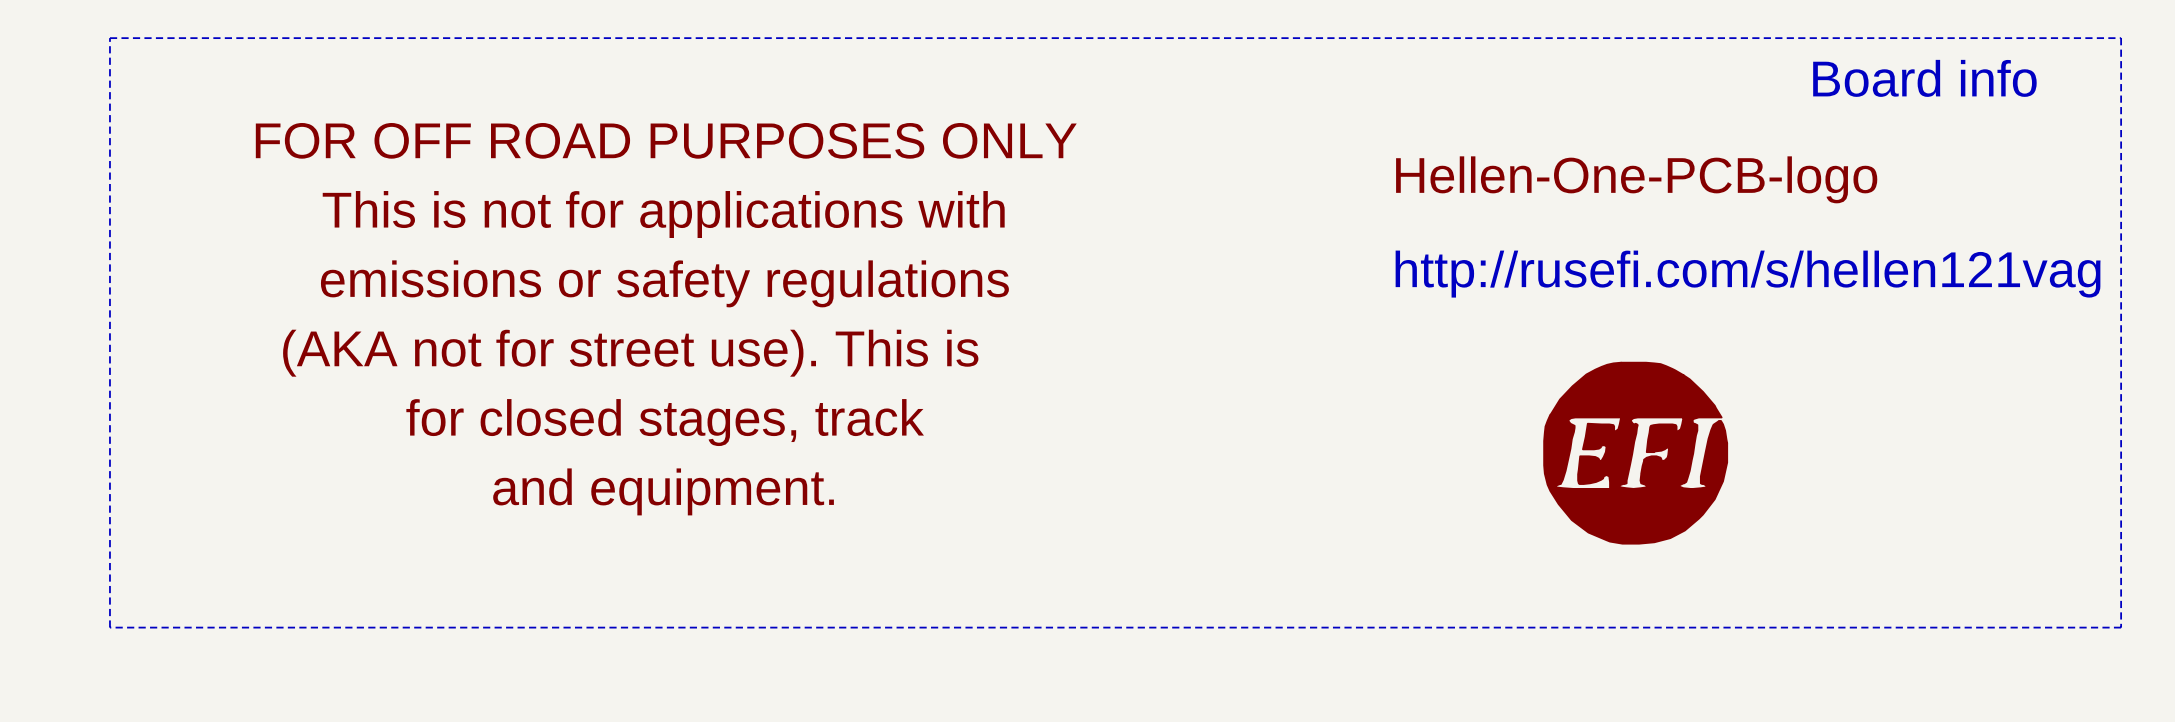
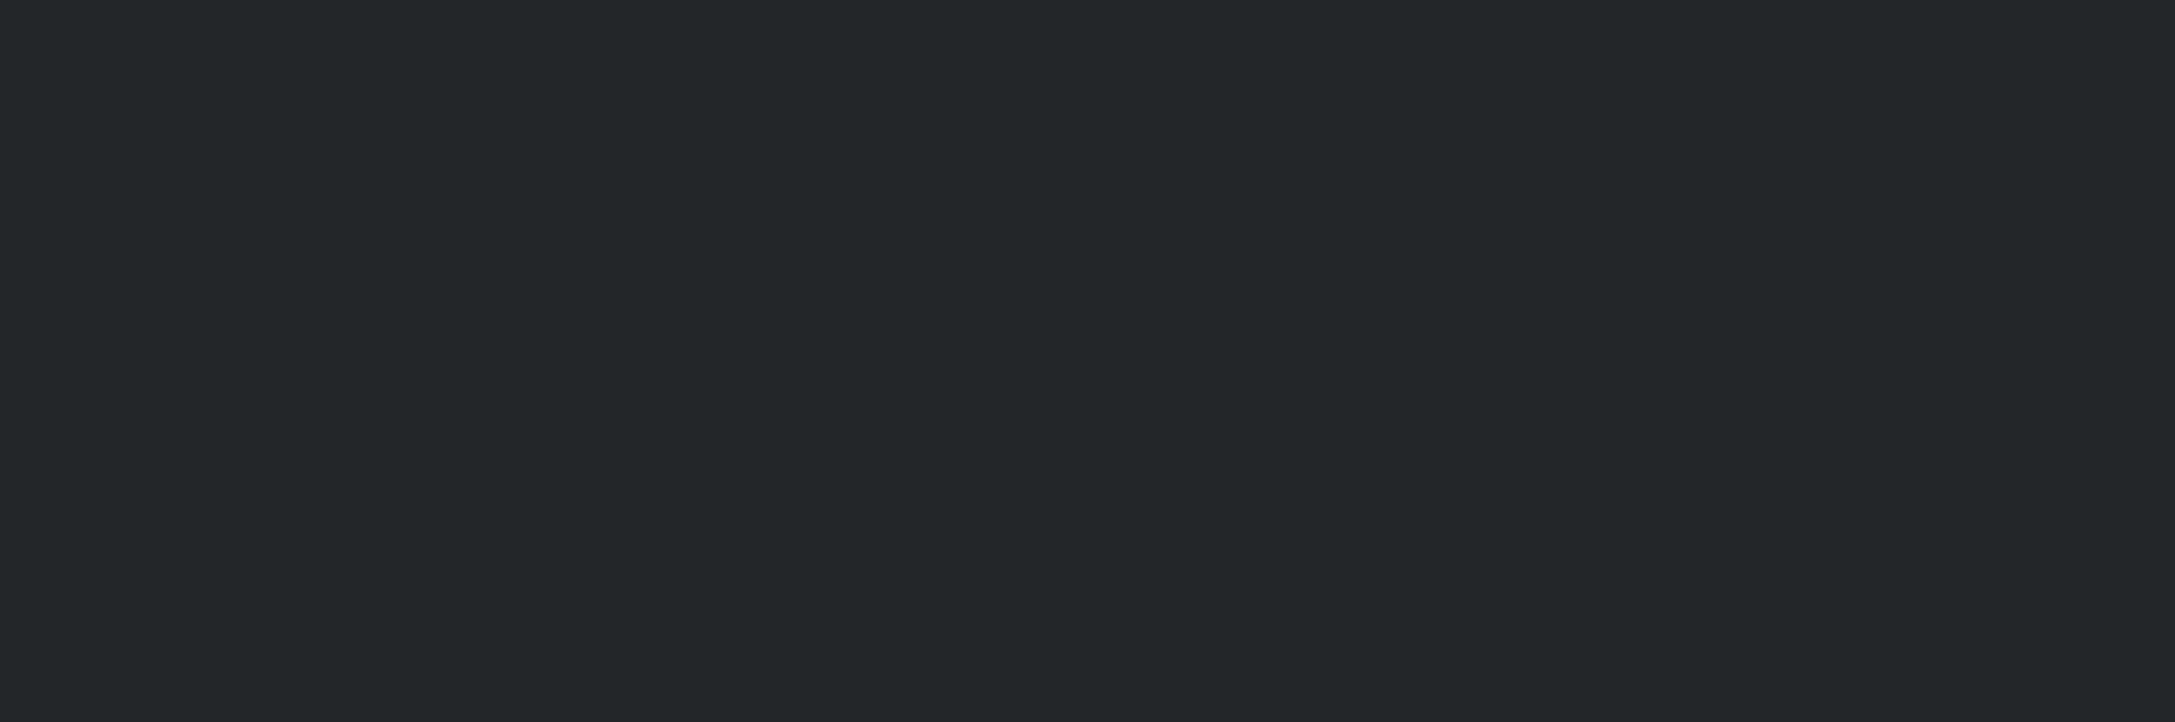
line: (109, 38) (109, 627) (2121, 627) (2121, 38) (109, 38) -> none
text: Board info (1924, 78) -> none
part: (1636, 179) -> none
text: http://rusefi.com/s/hellen121vag (1748, 274) -> none
part: (666, 319) -> none
part: (1635, 453) -> none

